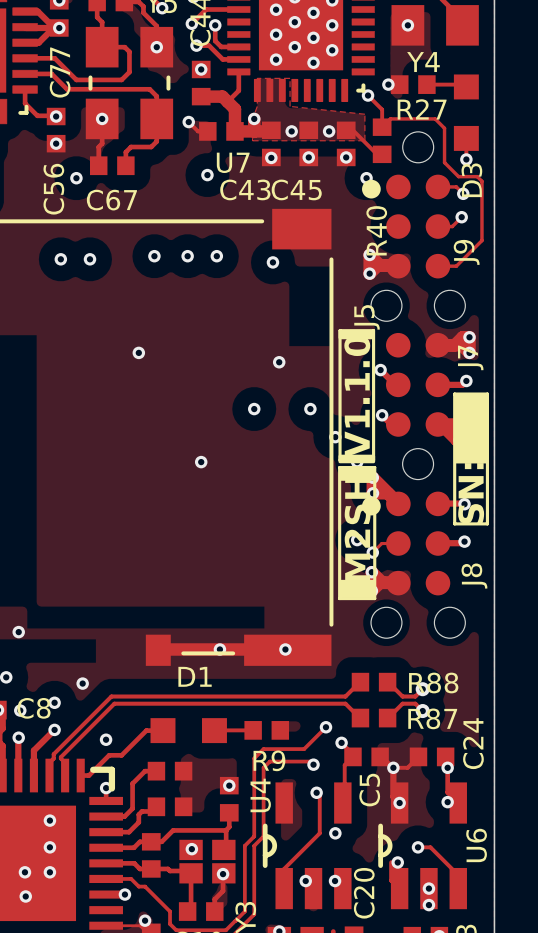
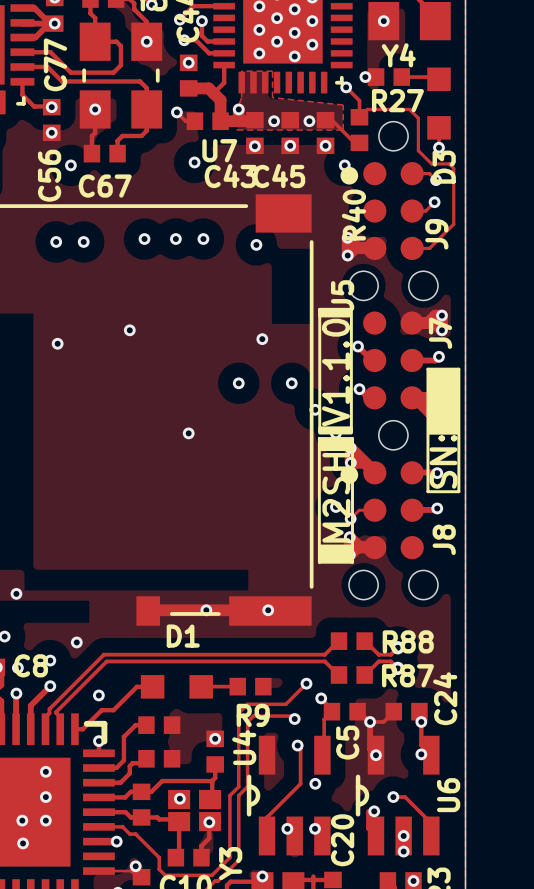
via: none -> (57, 343)

